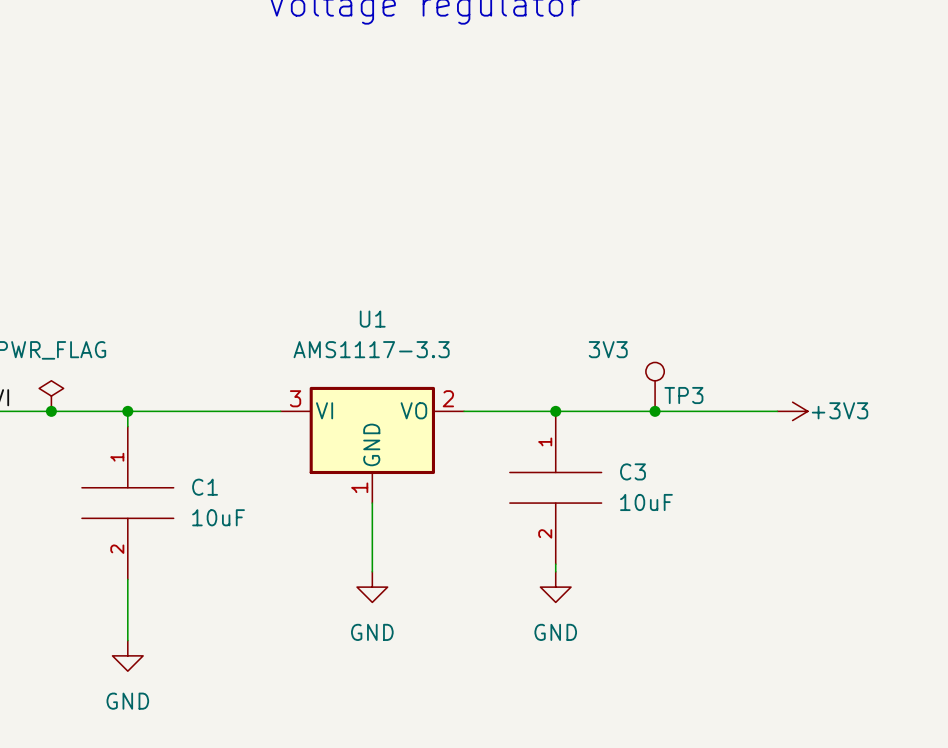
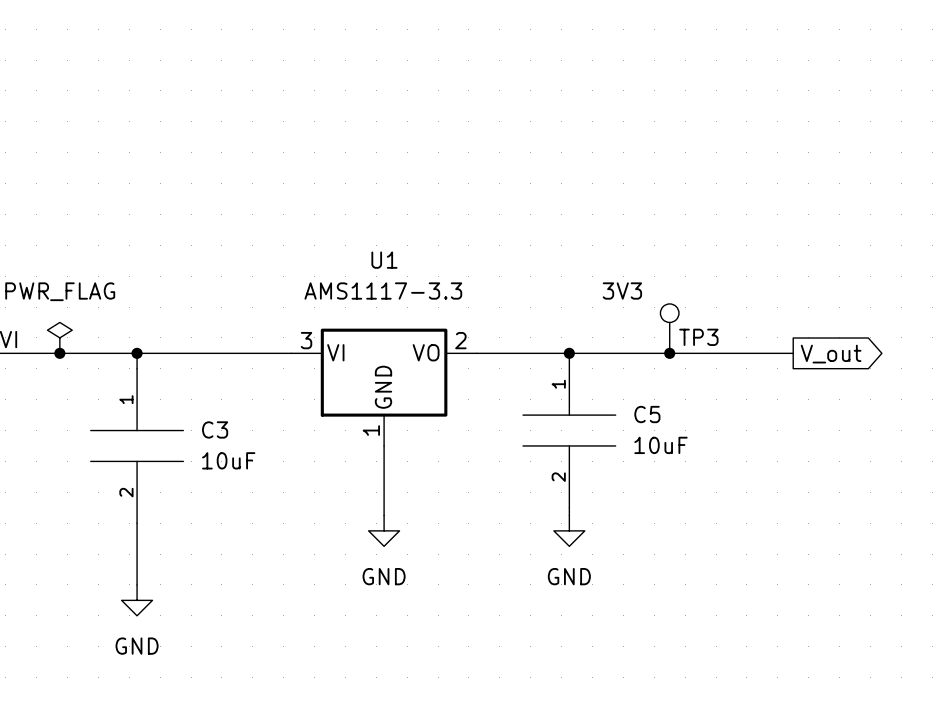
power symbol: +3V3 (792, 411) -> none
global label: none -> V_out (831, 354)
C3 name: C3 (632, 471) -> C5 (647, 414)
C1 name: C1 (205, 487) -> C3 (215, 429)

